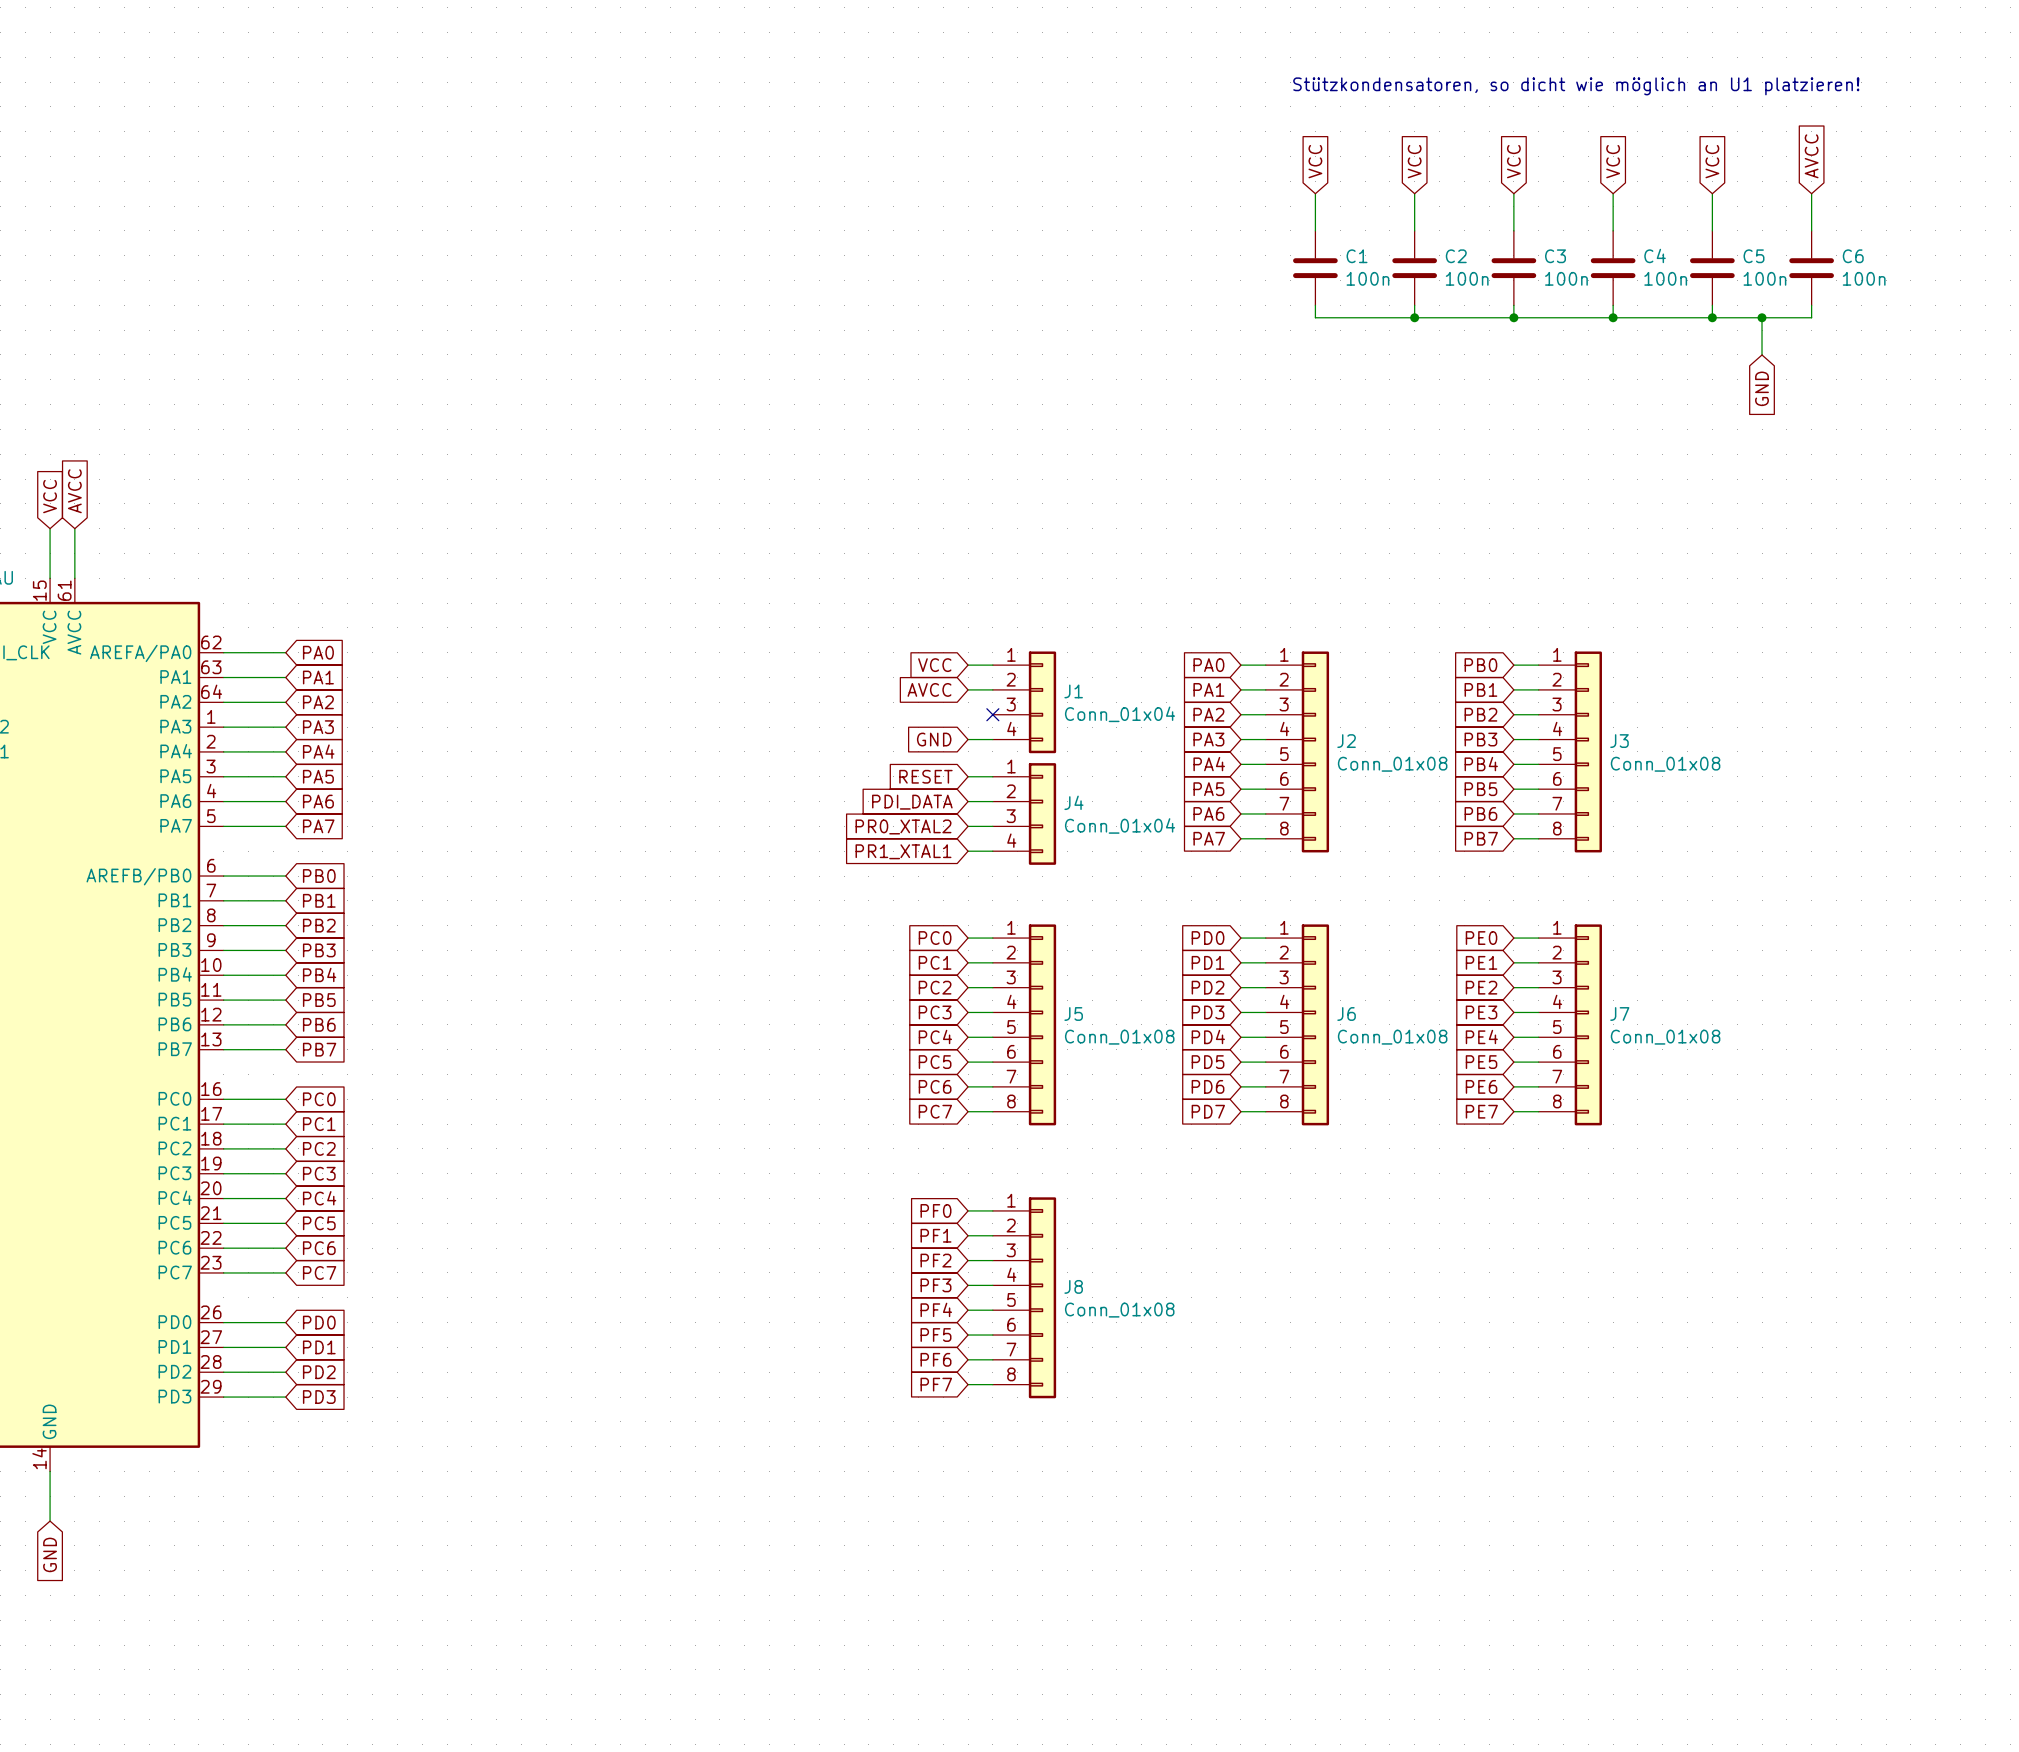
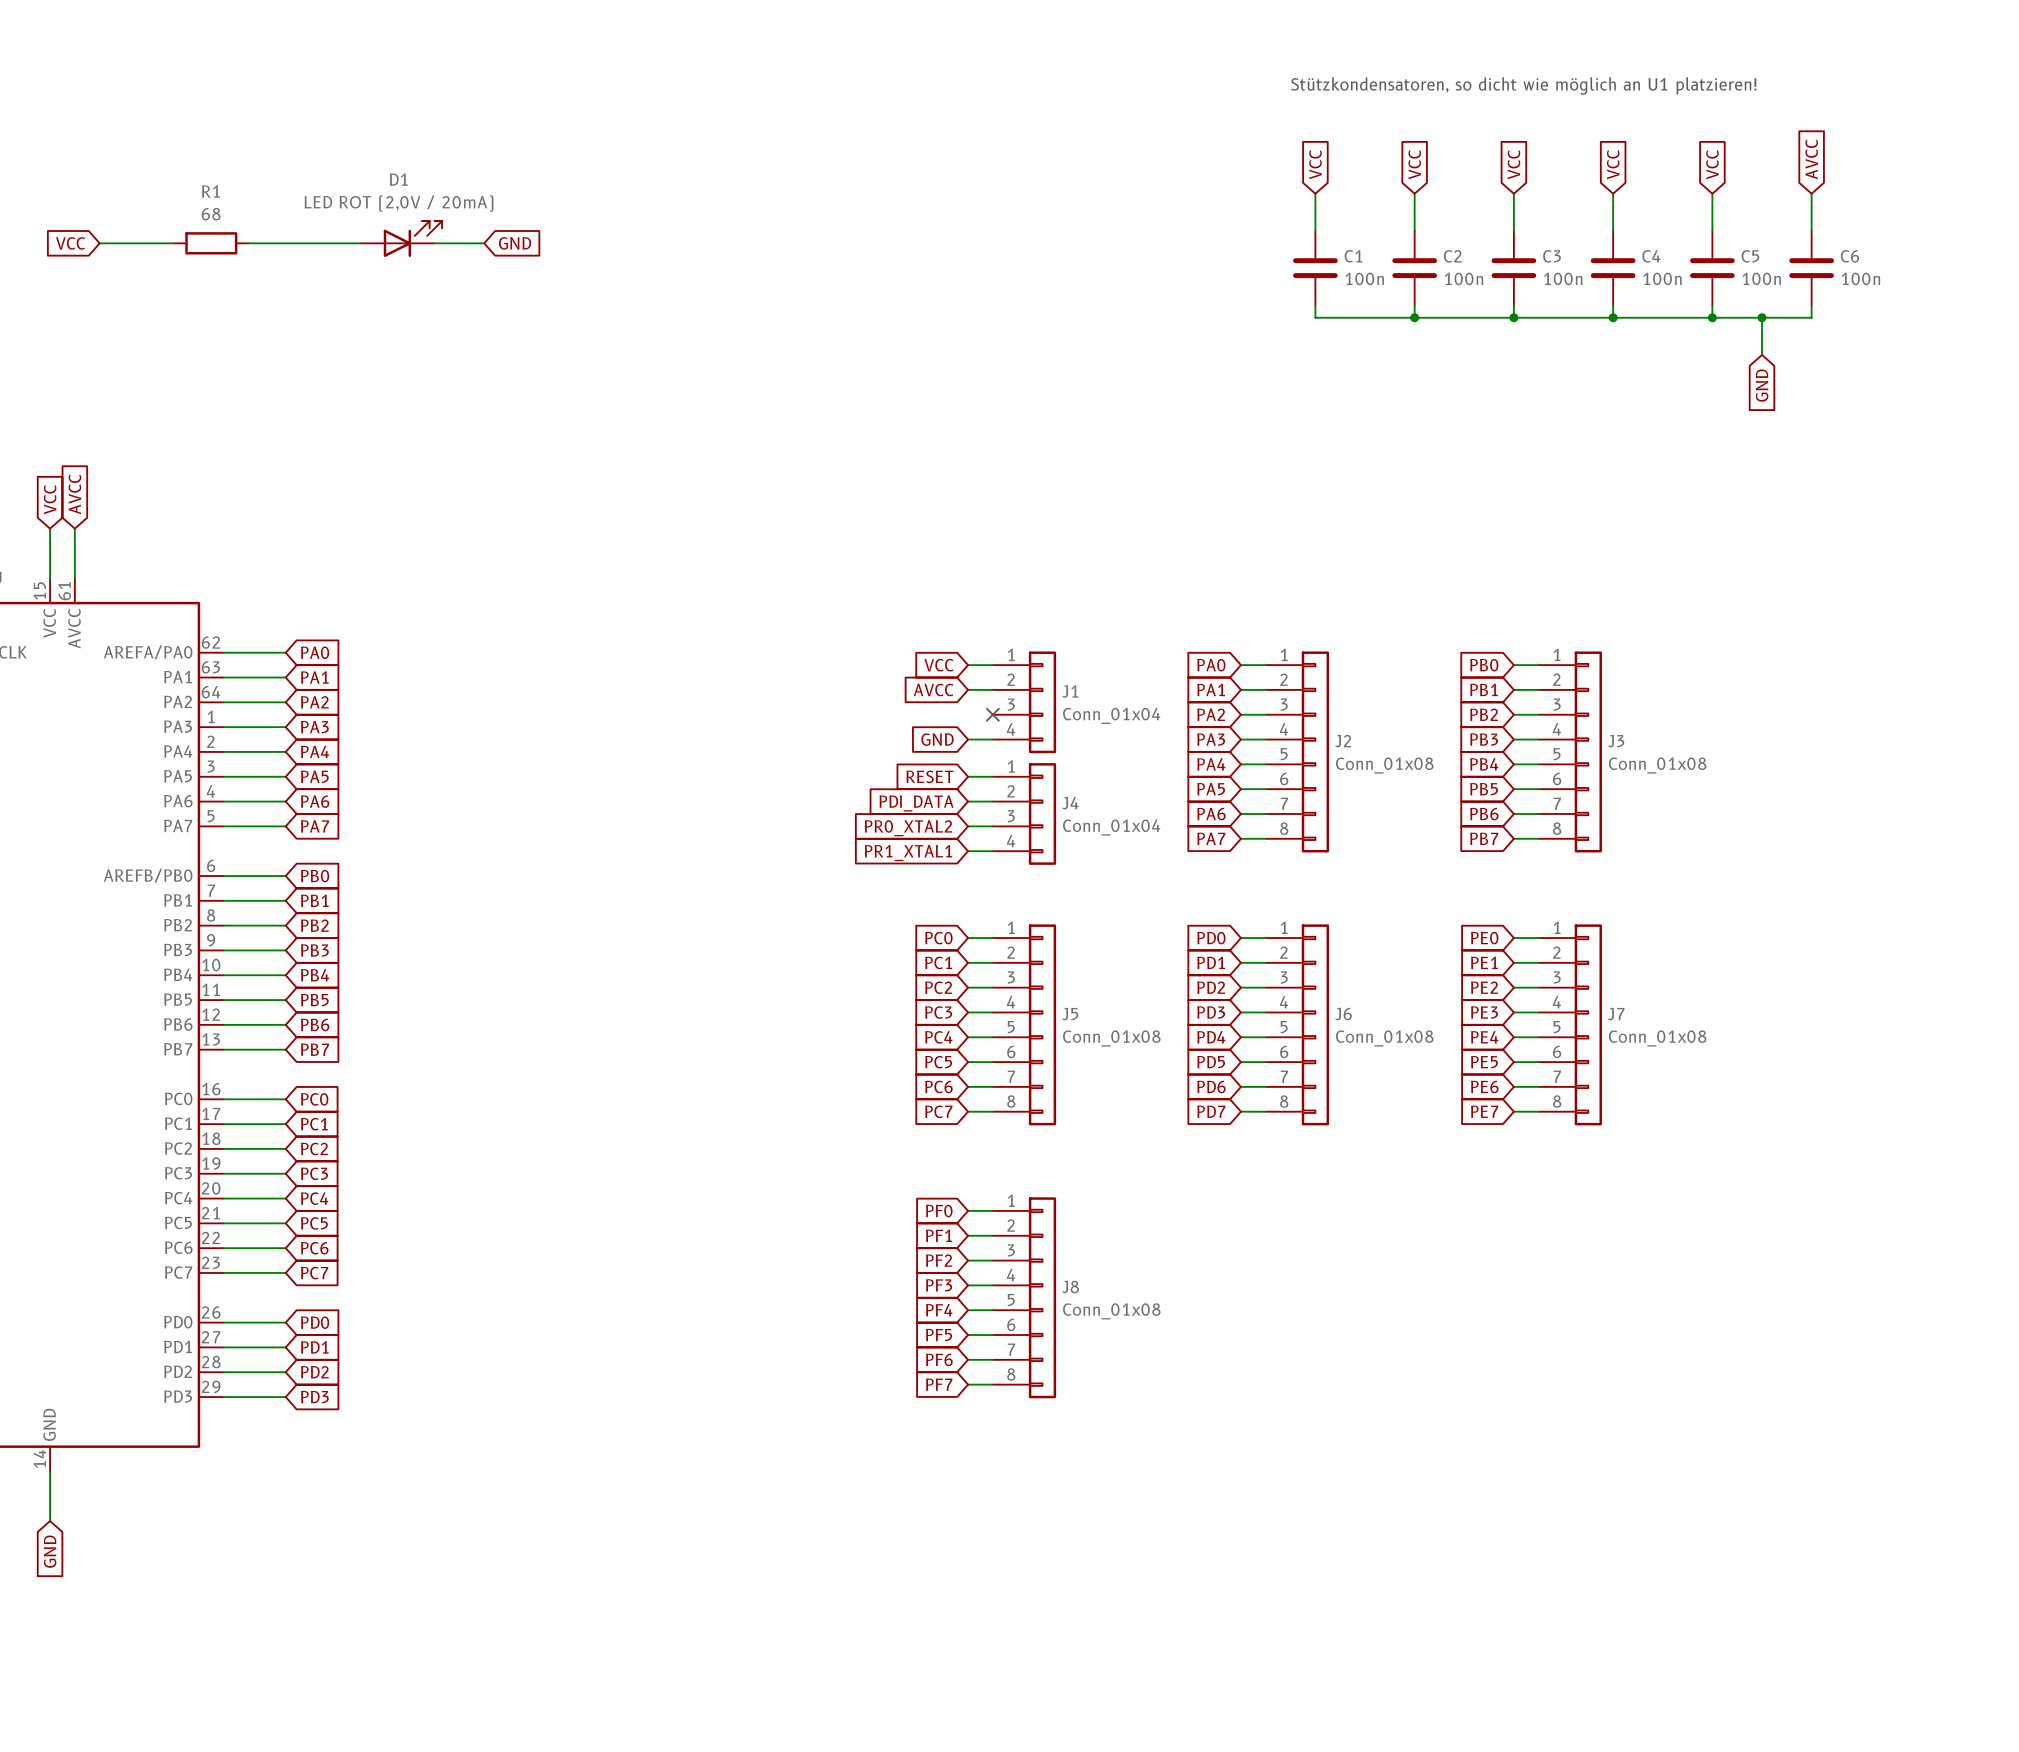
D1: none -> LED ROT (2,0V / 20mA) (401, 238)
global label: none -> VCC (70, 243)
wire: none -> (99, 243) (174, 243)
R1: none -> 68 (211, 243)
wire: none -> (248, 243) (360, 243)
wire: none -> (434, 243) (484, 243)
global label: none -> GND (515, 243)

